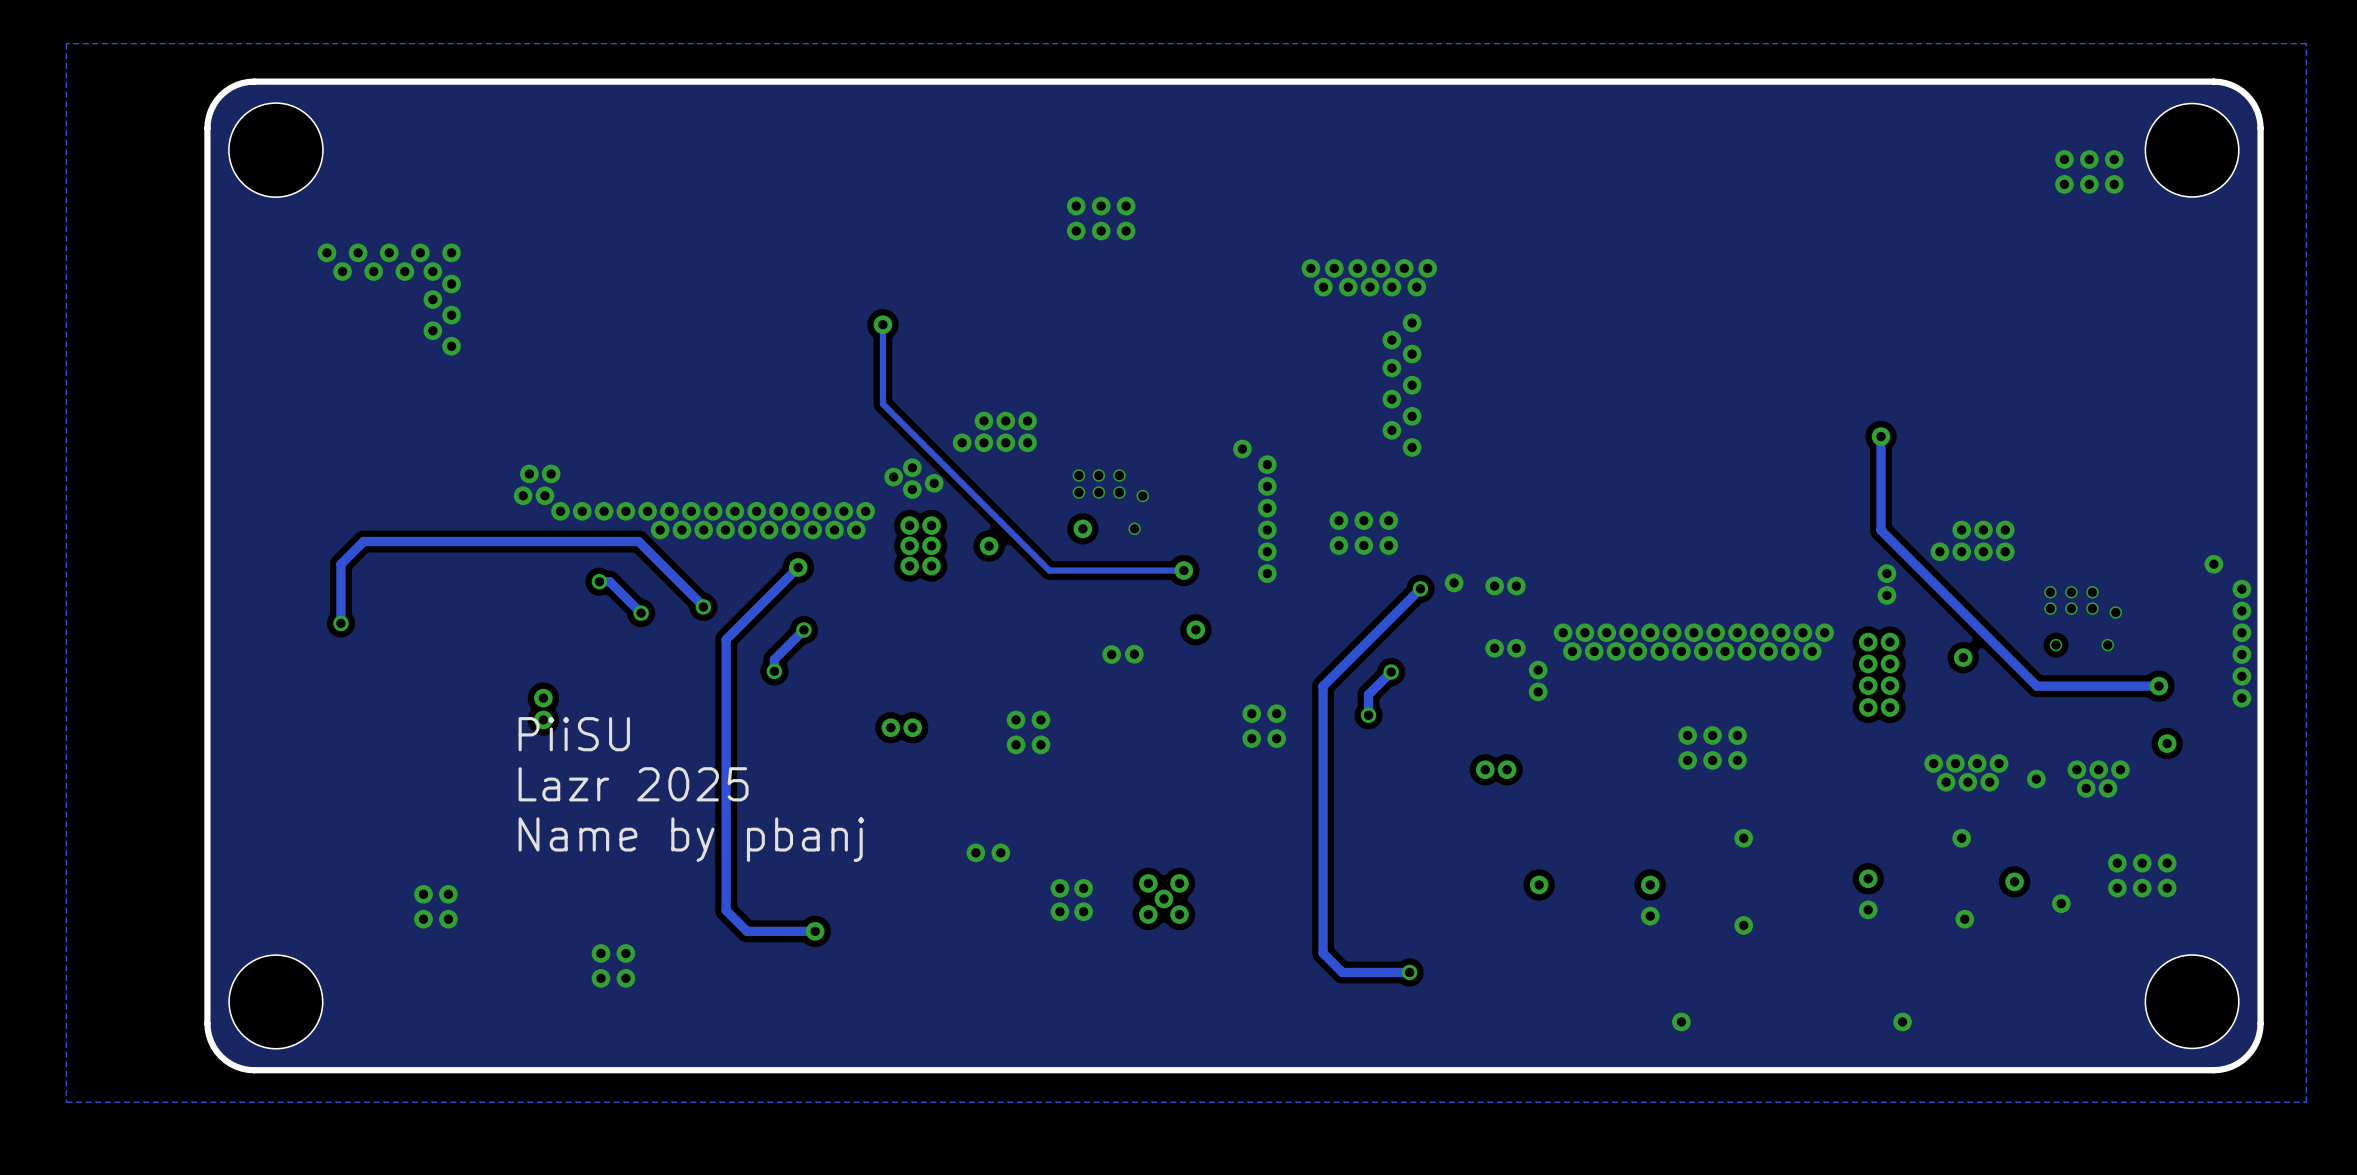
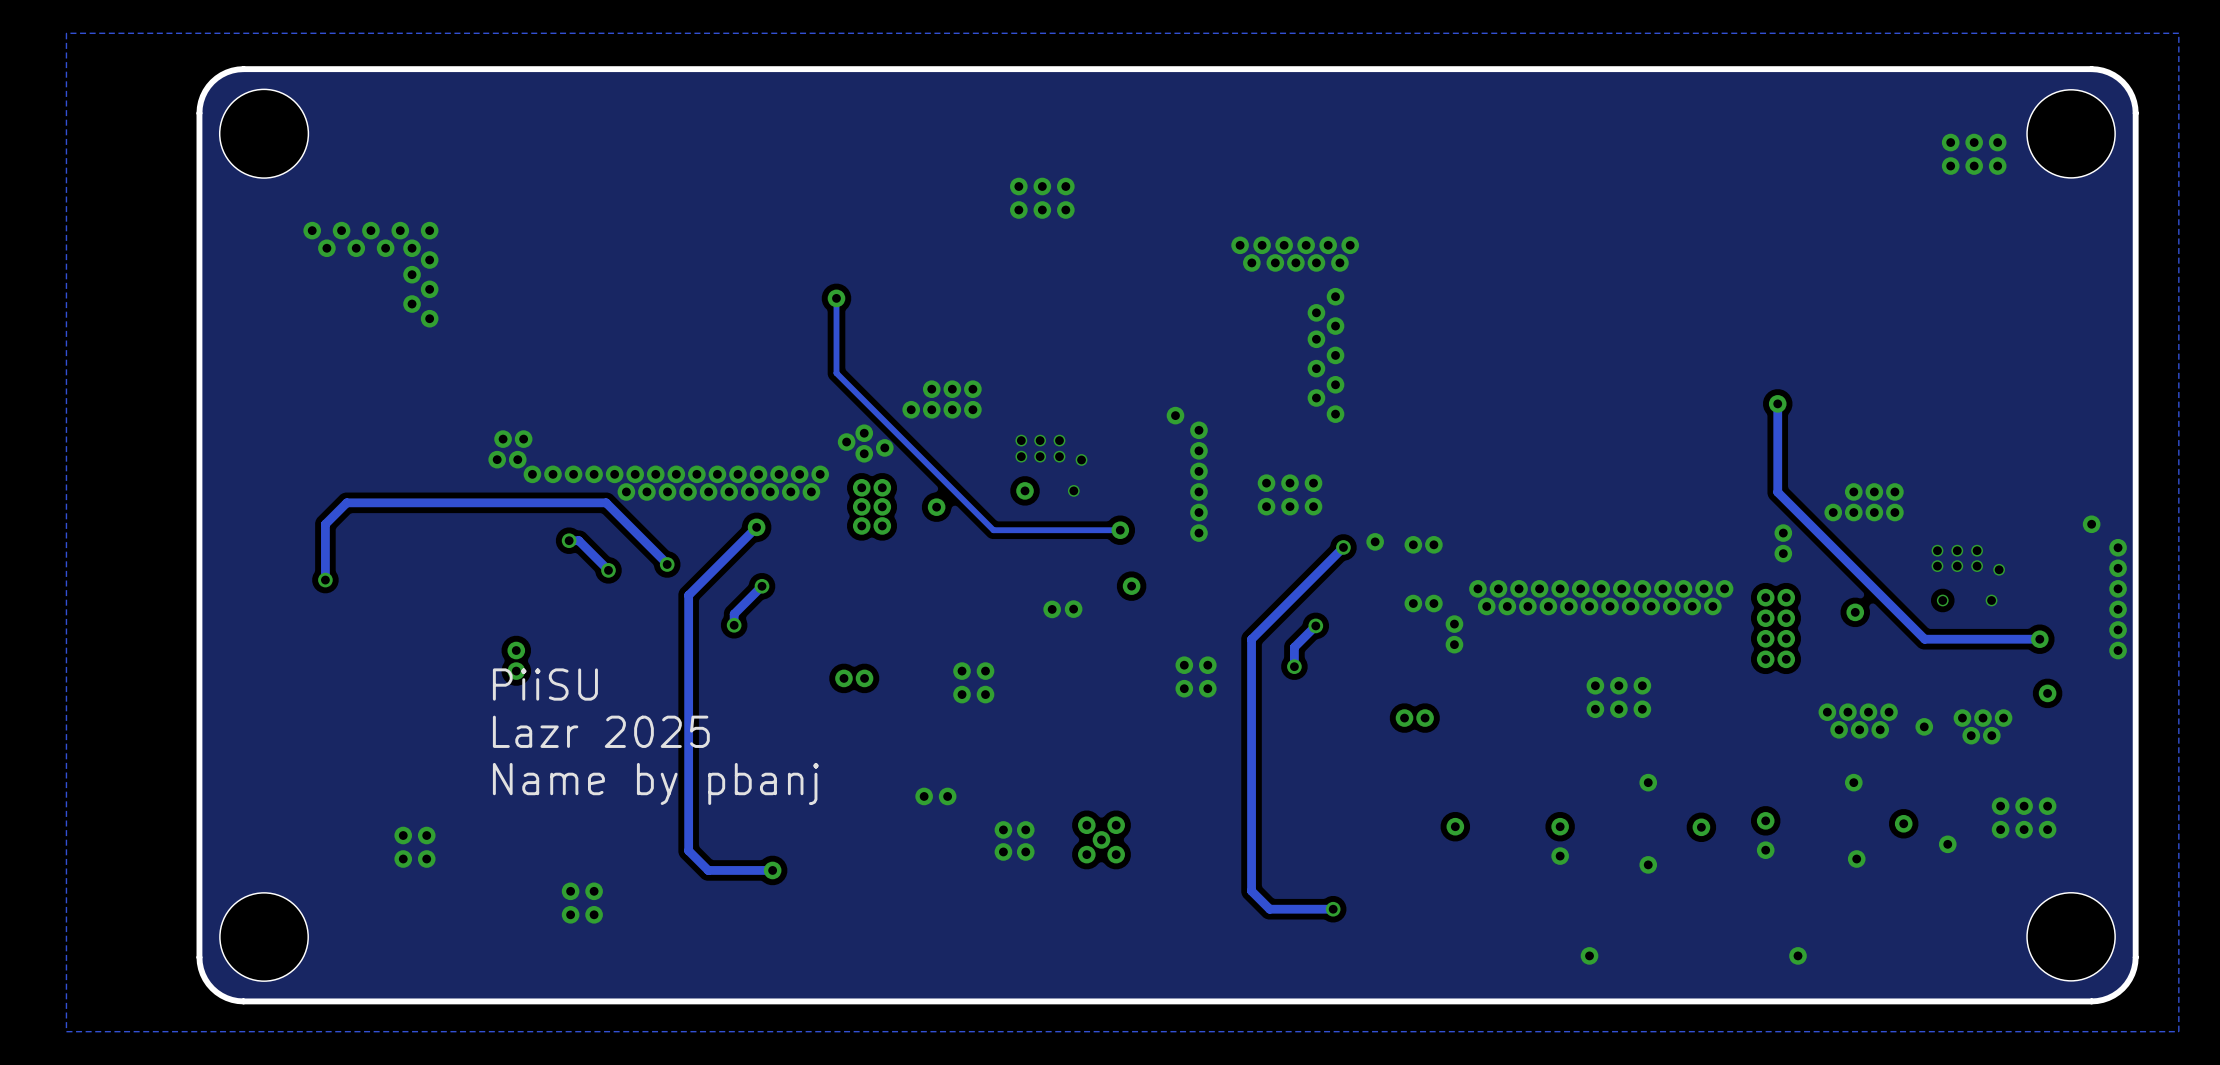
via: none -> (1701, 827)

